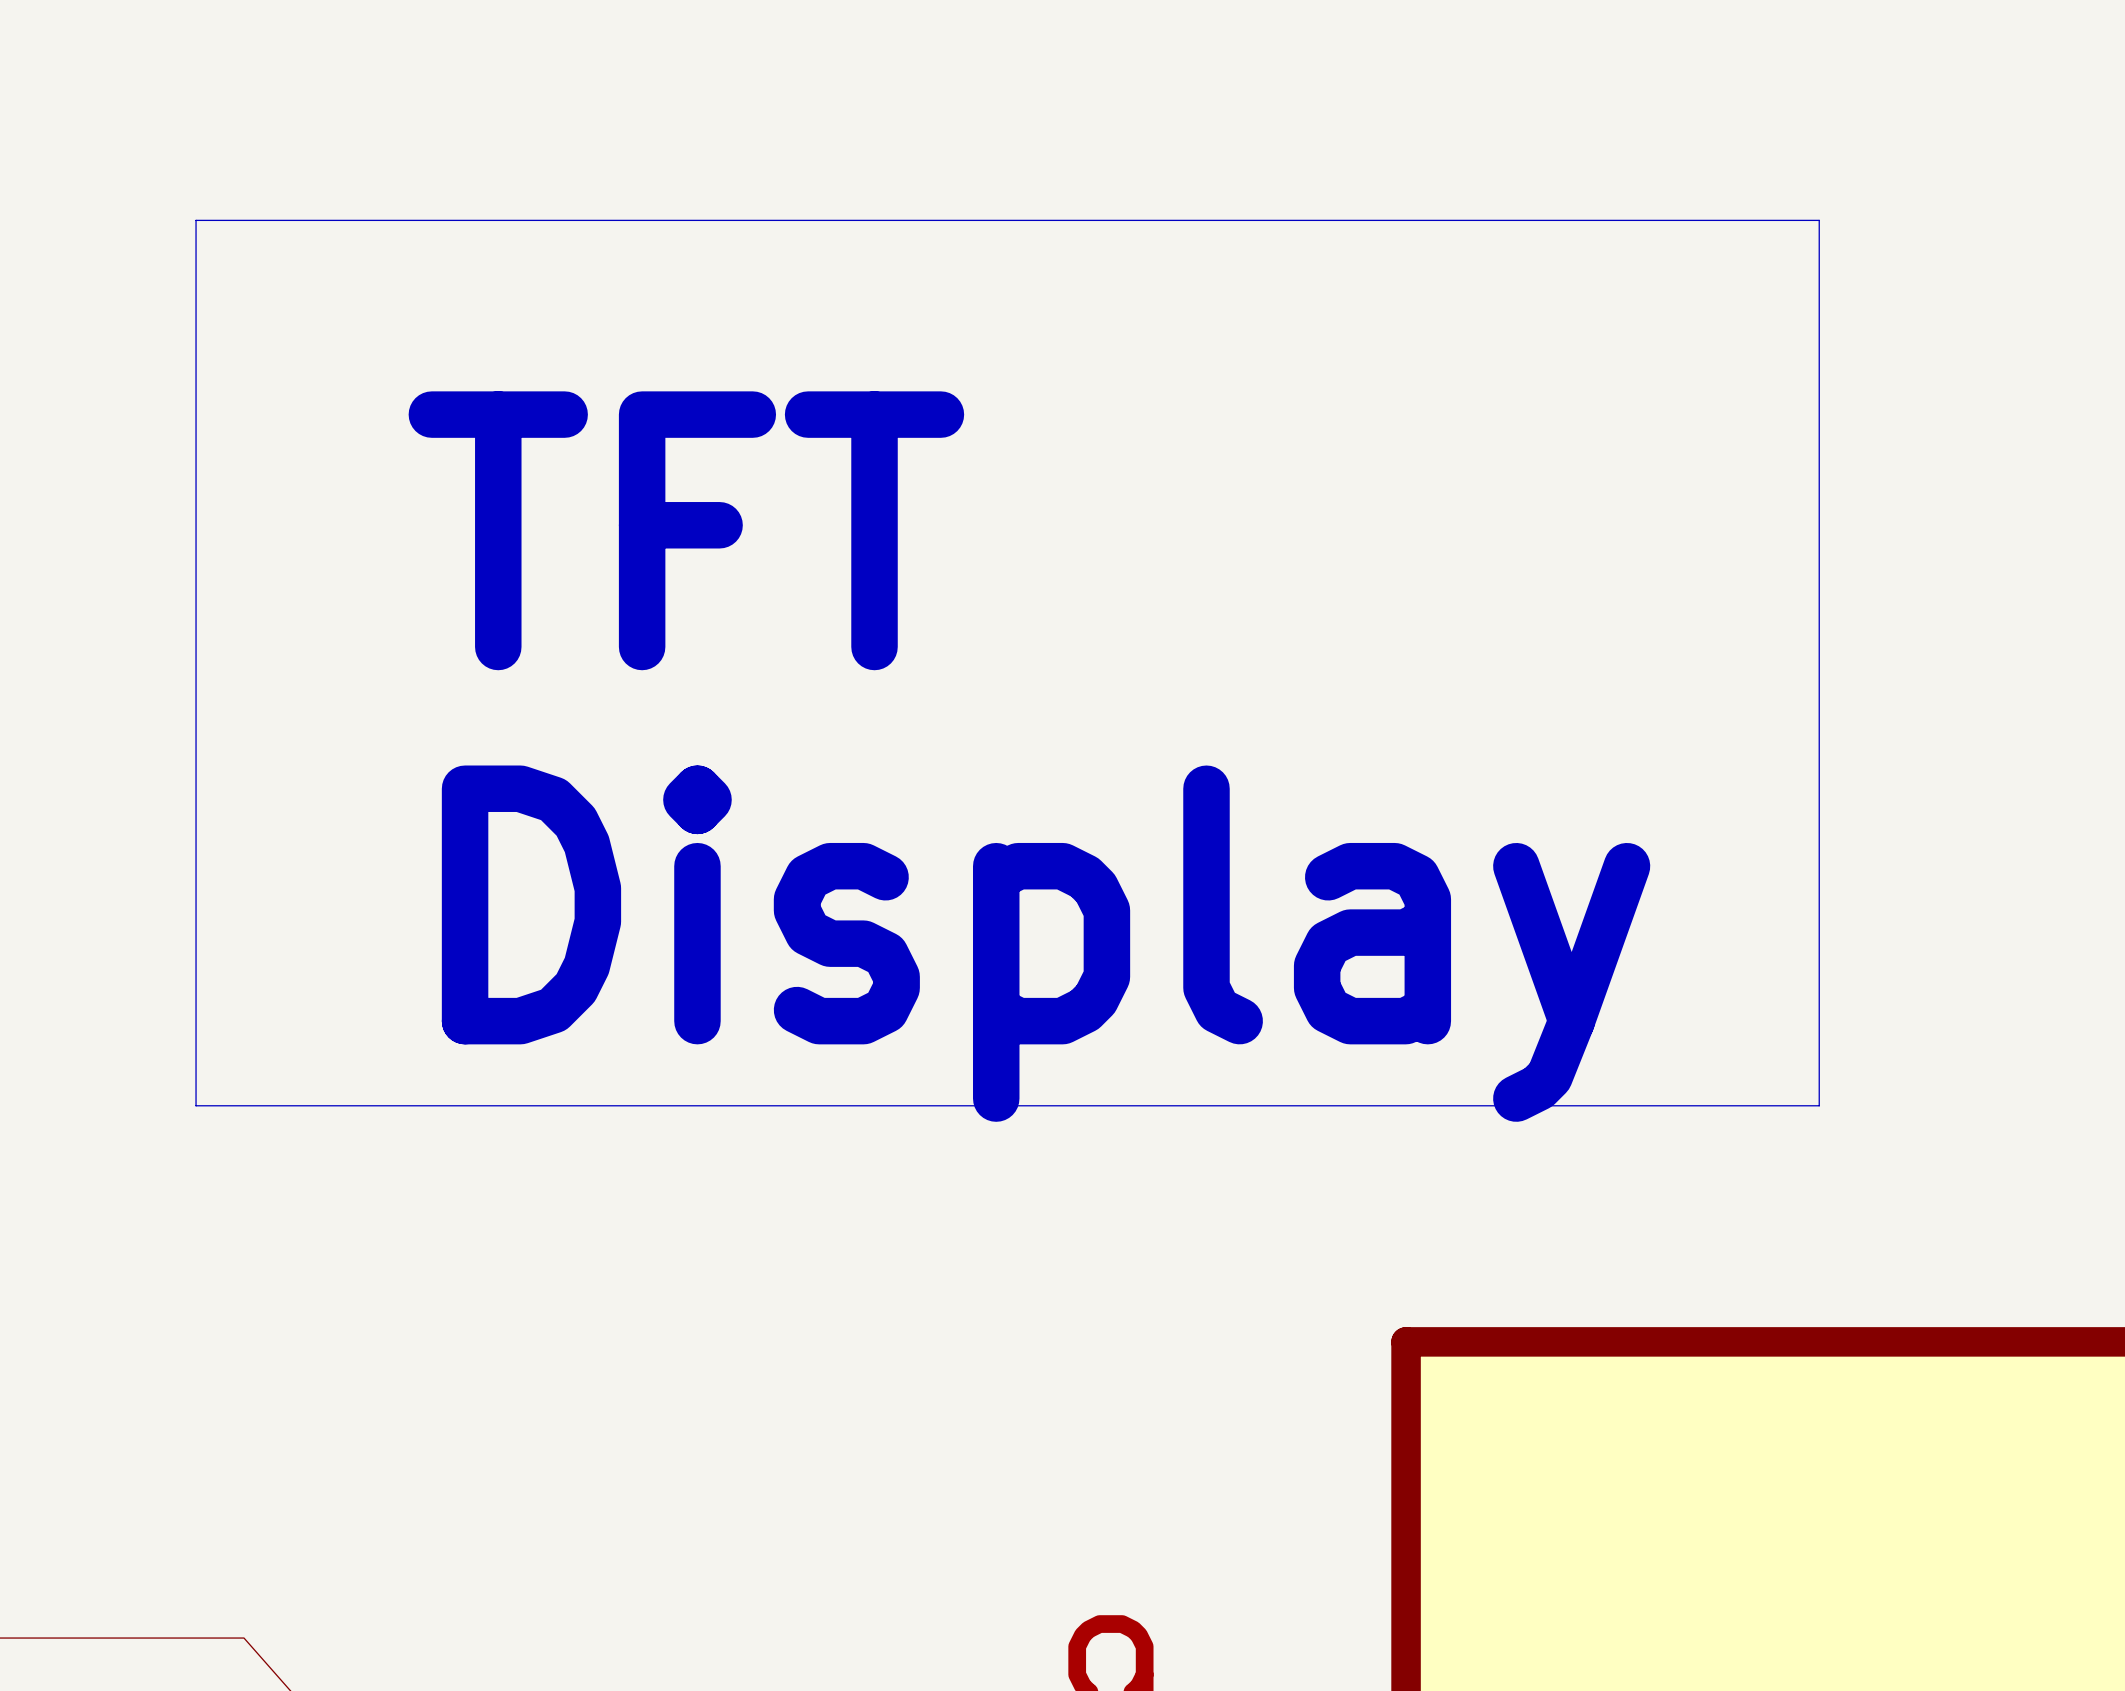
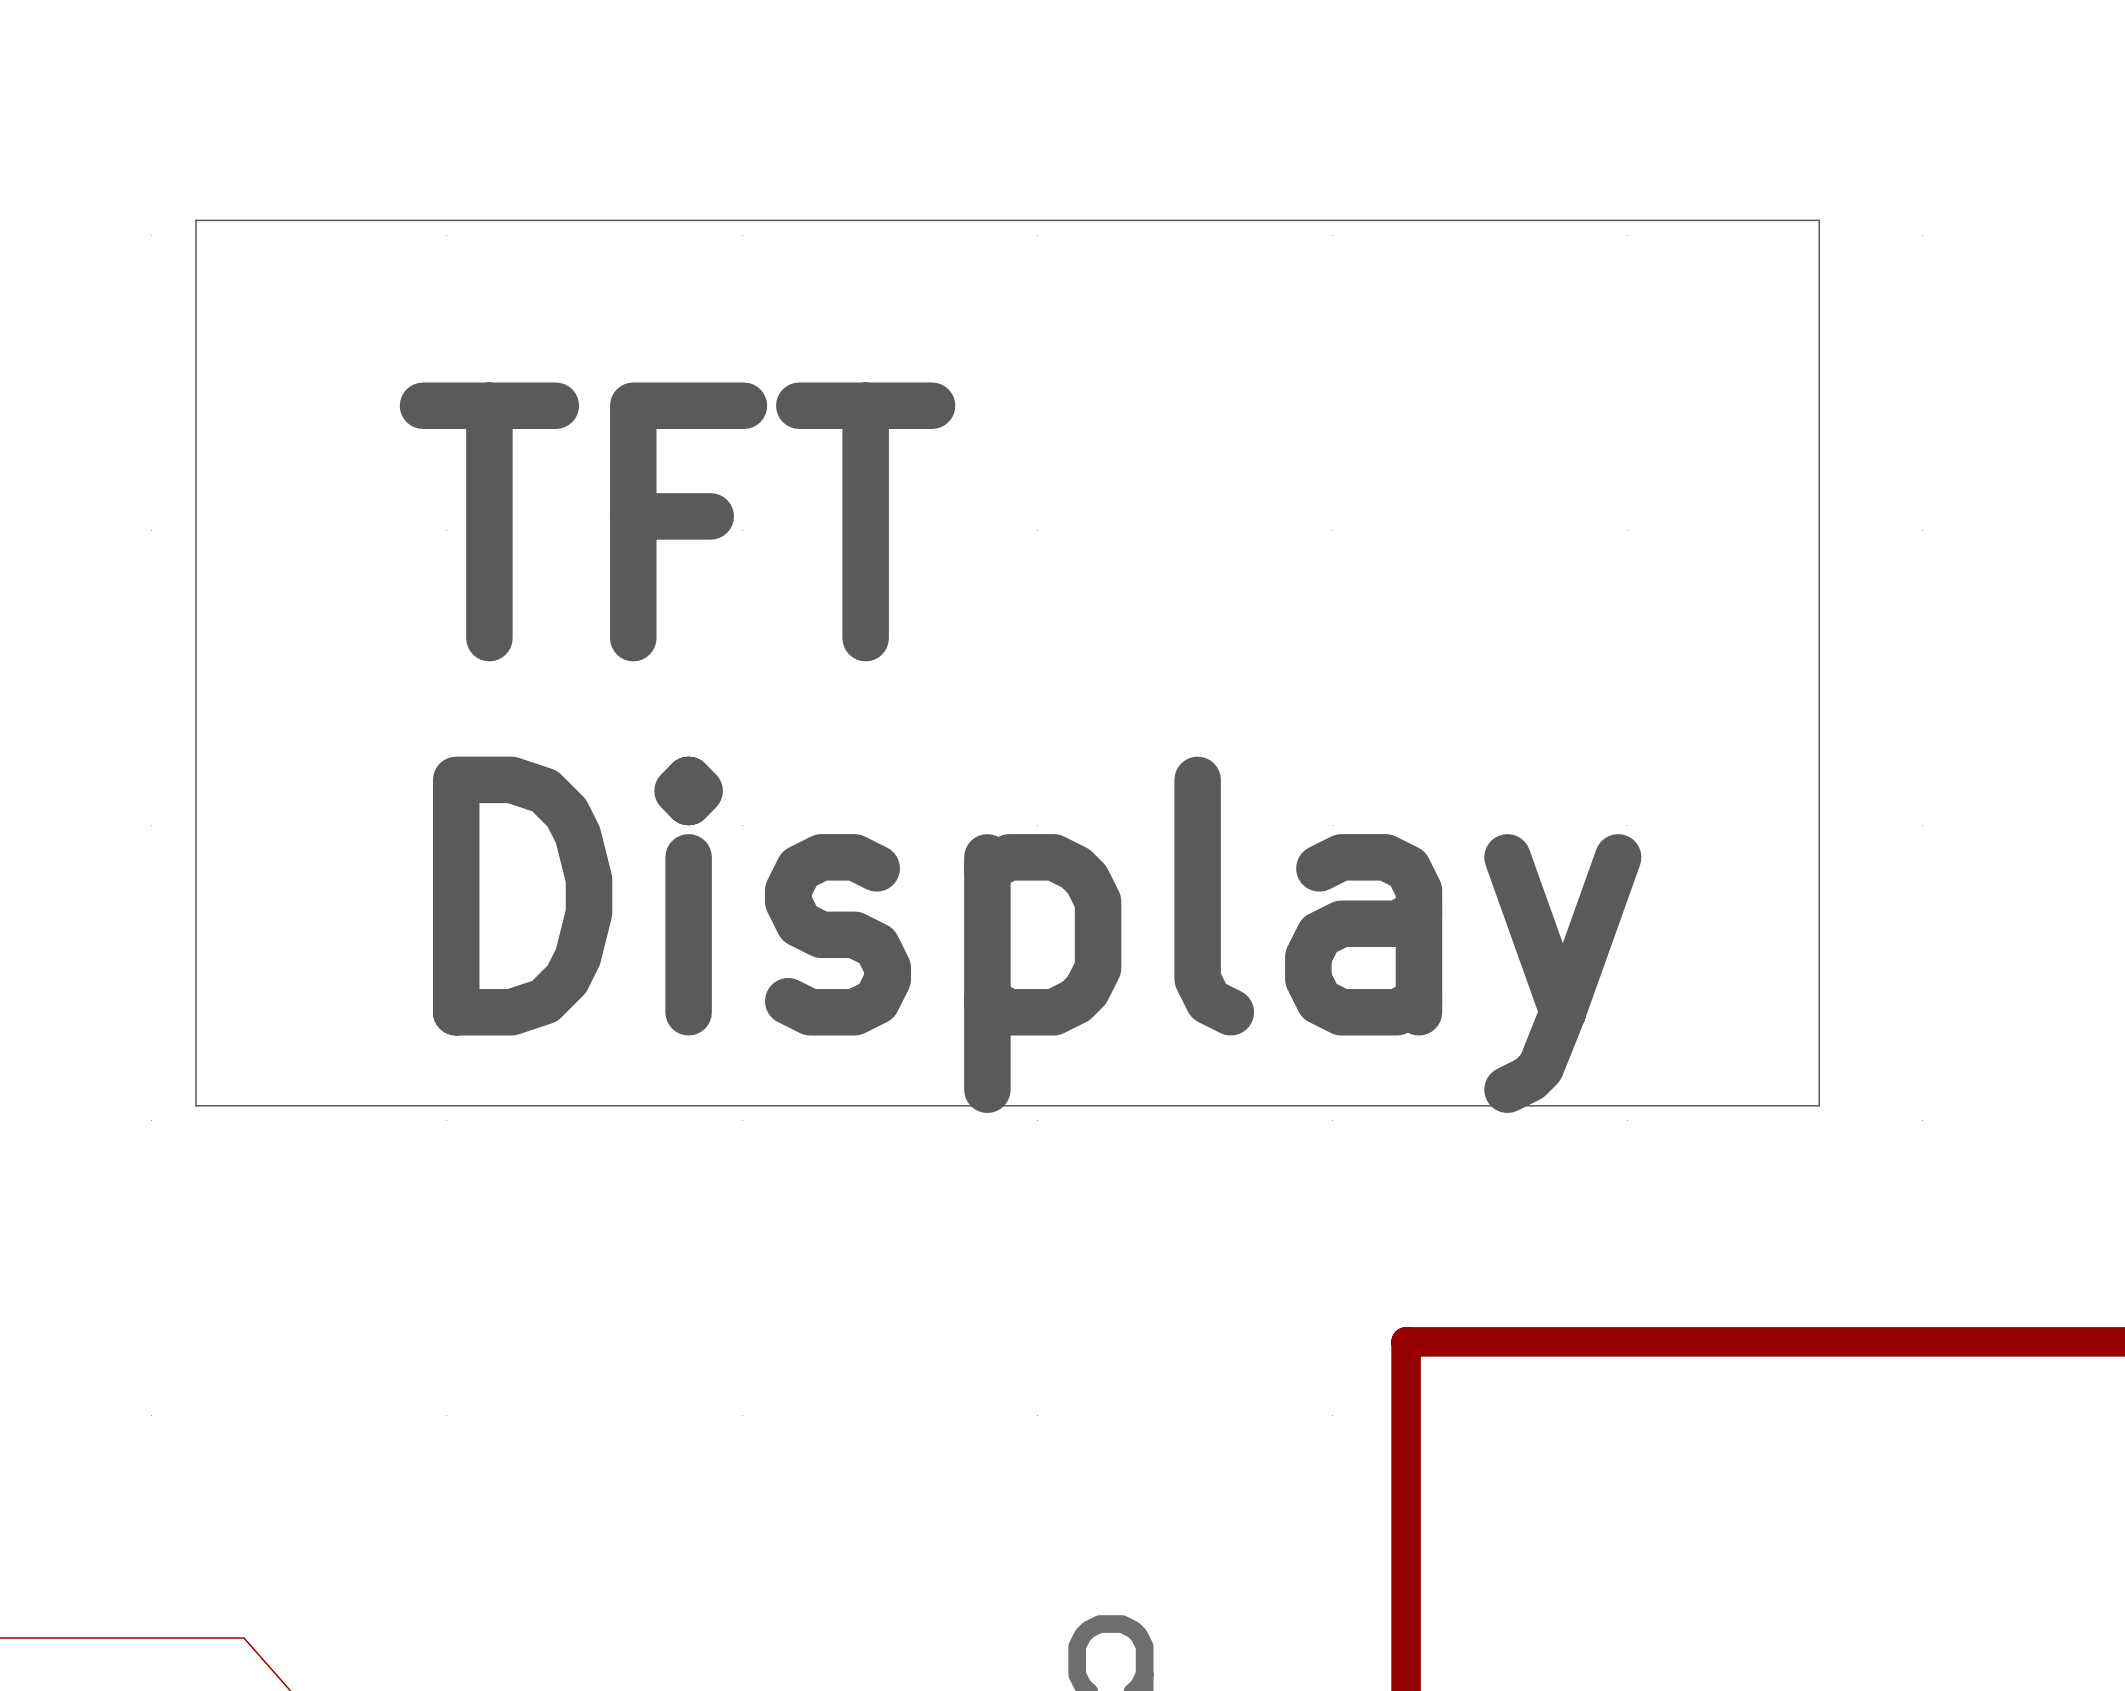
text position: TFT (686, 530) -> TFT (677, 521)
text position: Display (1046, 943) -> Display (1037, 934)

